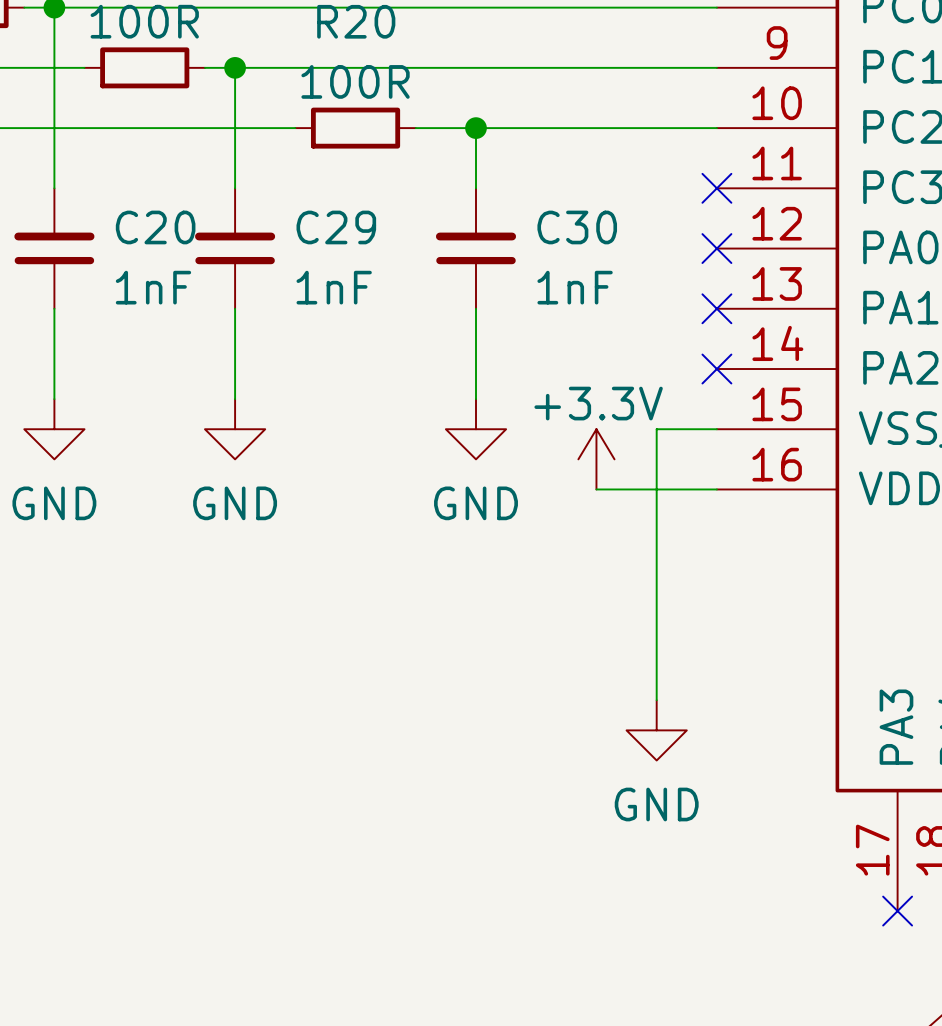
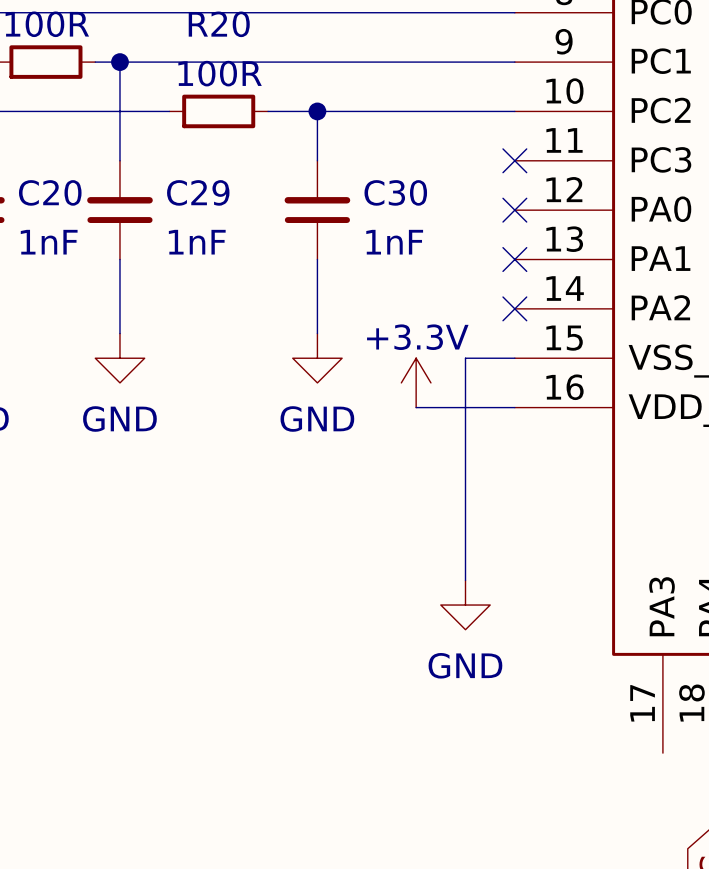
no-connect mark: (897, 911) -> none

